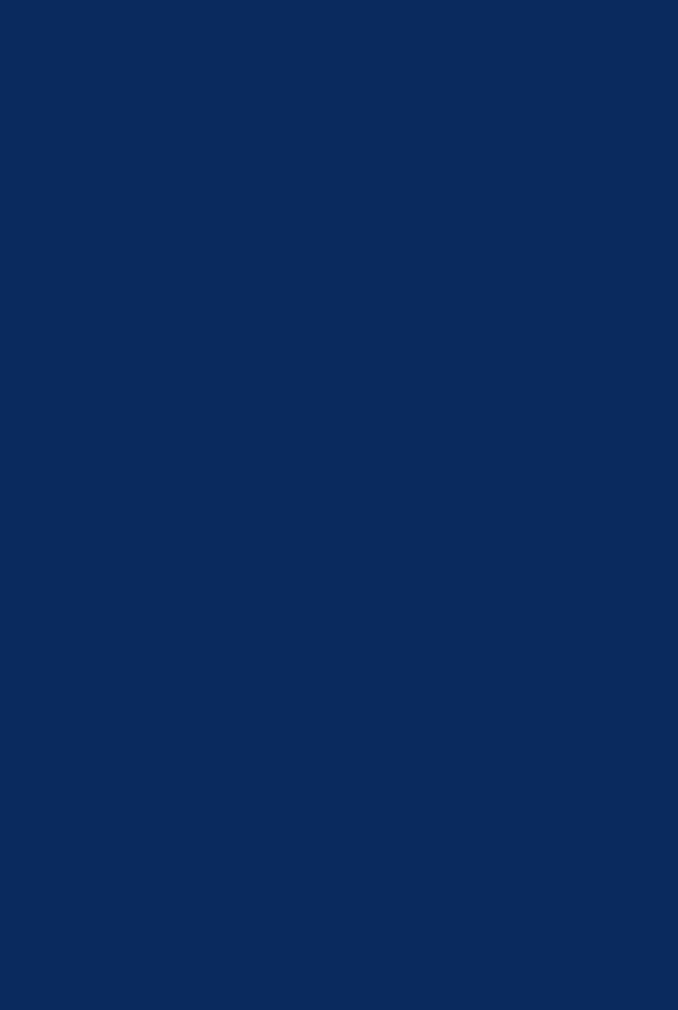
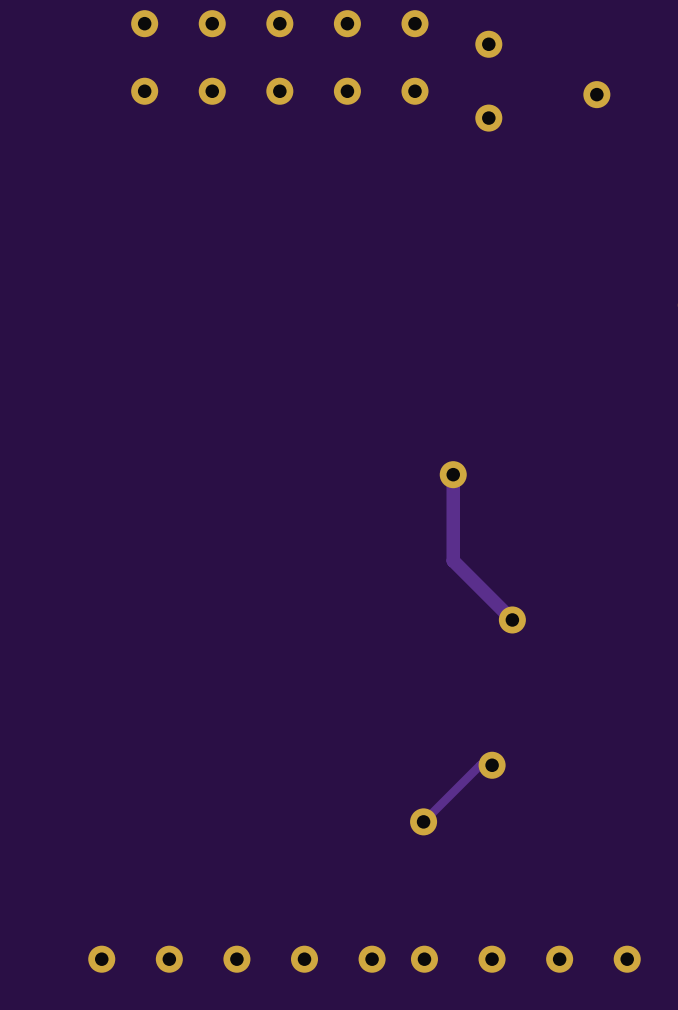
via: none -> (144, 23)
via: none -> (212, 23)
via: none -> (279, 23)
via: none -> (347, 23)
via: none -> (414, 23)
via: none -> (488, 44)
via: none -> (144, 91)
via: none -> (212, 91)
via: none -> (279, 91)
via: none -> (347, 91)
via: none -> (414, 91)
via: none -> (596, 94)
via: none -> (488, 118)
track: none -> (453, 474) (453, 560) (512, 619)
via: none -> (453, 474)
via: none -> (512, 619)
track: none -> (492, 765) (480, 765) (423, 821)
via: none -> (492, 765)
via: none -> (423, 821)
via: none -> (101, 959)
via: none -> (169, 959)
via: none -> (236, 959)
via: none -> (304, 959)
via: none -> (372, 959)
via: none -> (424, 959)
via: none -> (492, 959)
via: none -> (559, 959)
via: none -> (627, 959)

